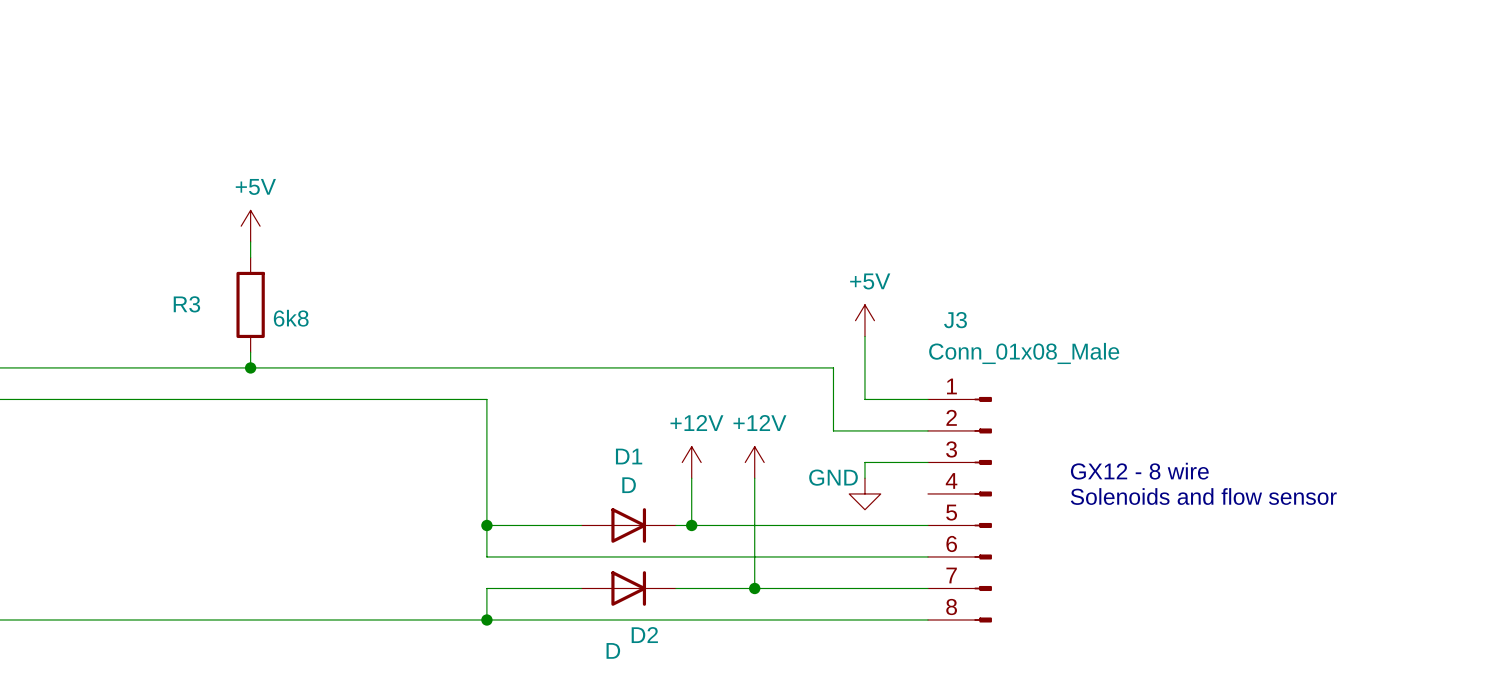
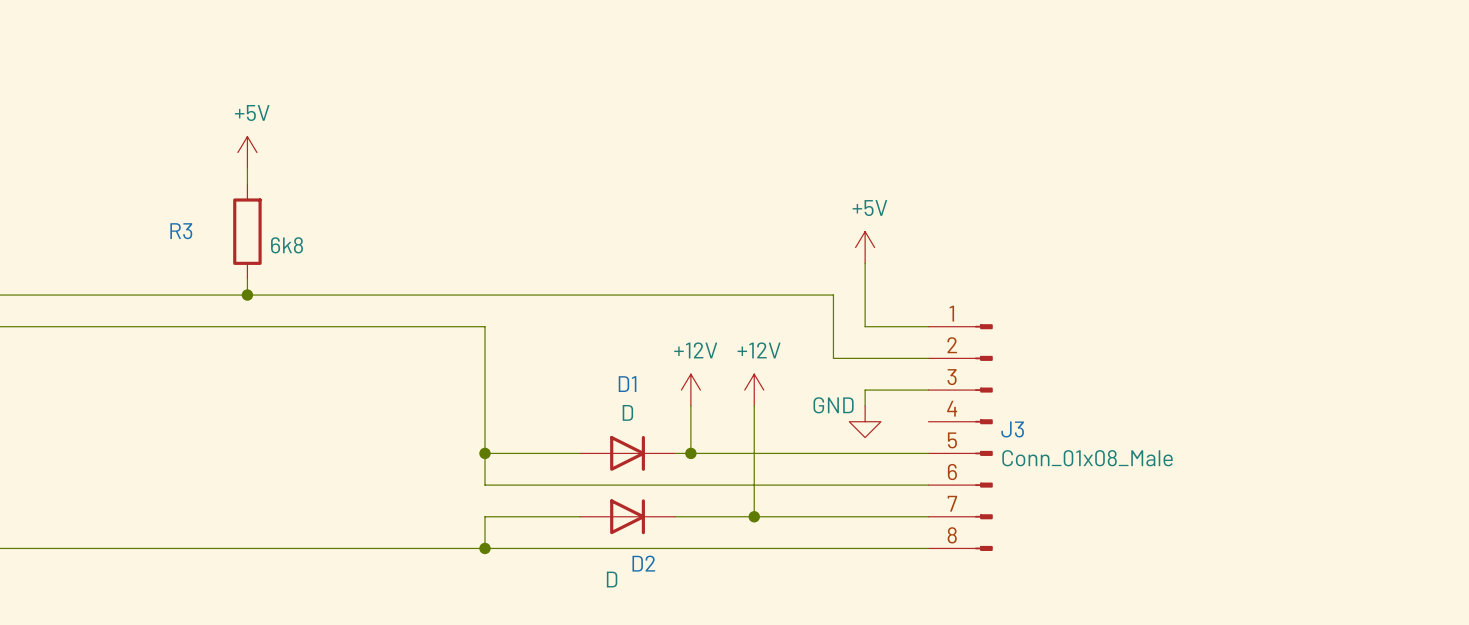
J3 name position: J3 (955, 320) -> J3 (1012, 429)
J3 value position: Conn_01x08_Male (1024, 353) -> Conn_01x08_Male (1087, 458)
text: GX12 - 8 wire (1139, 471) -> none
text: Solenoids and flow sensor (1203, 496) -> none

